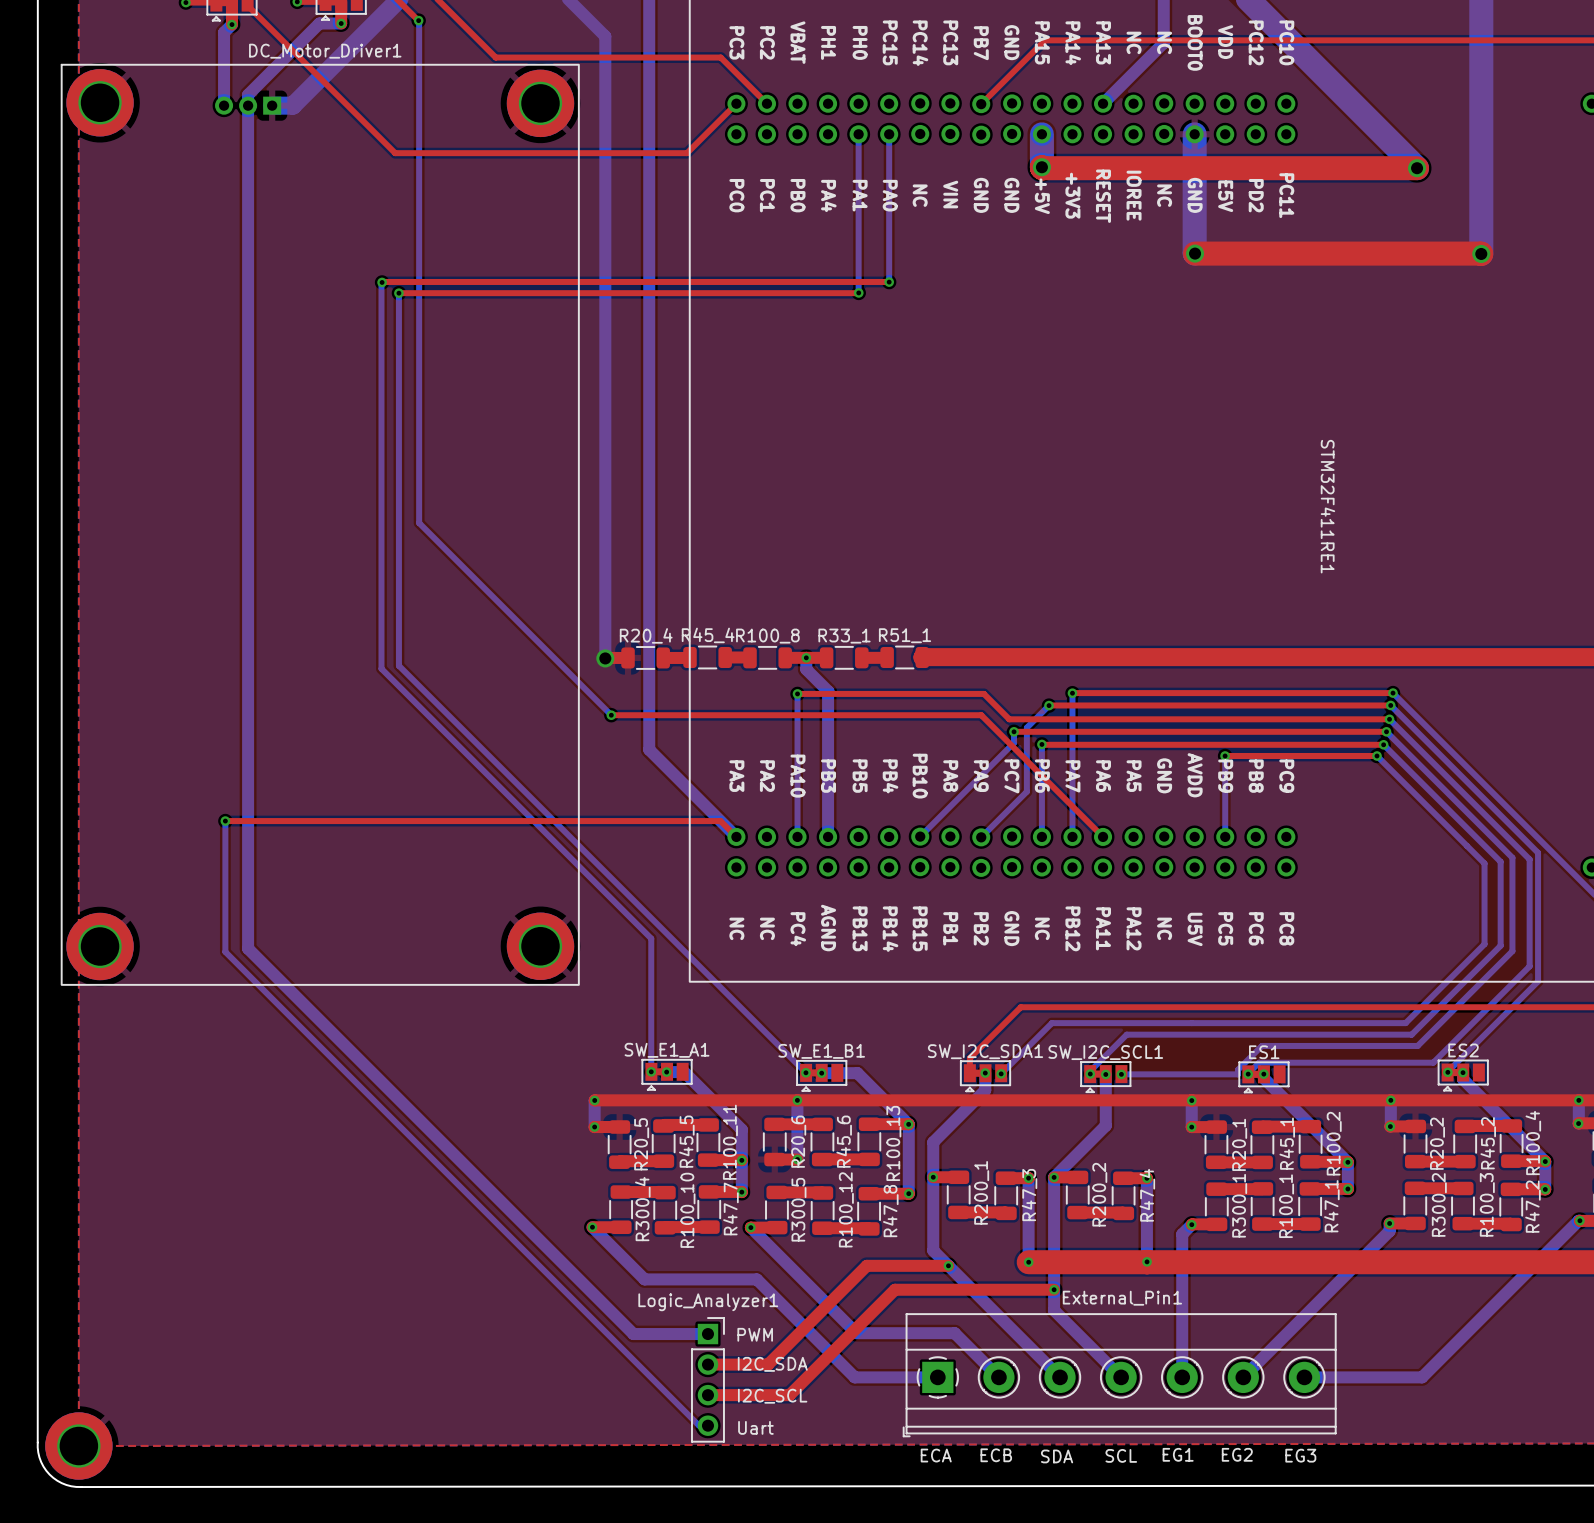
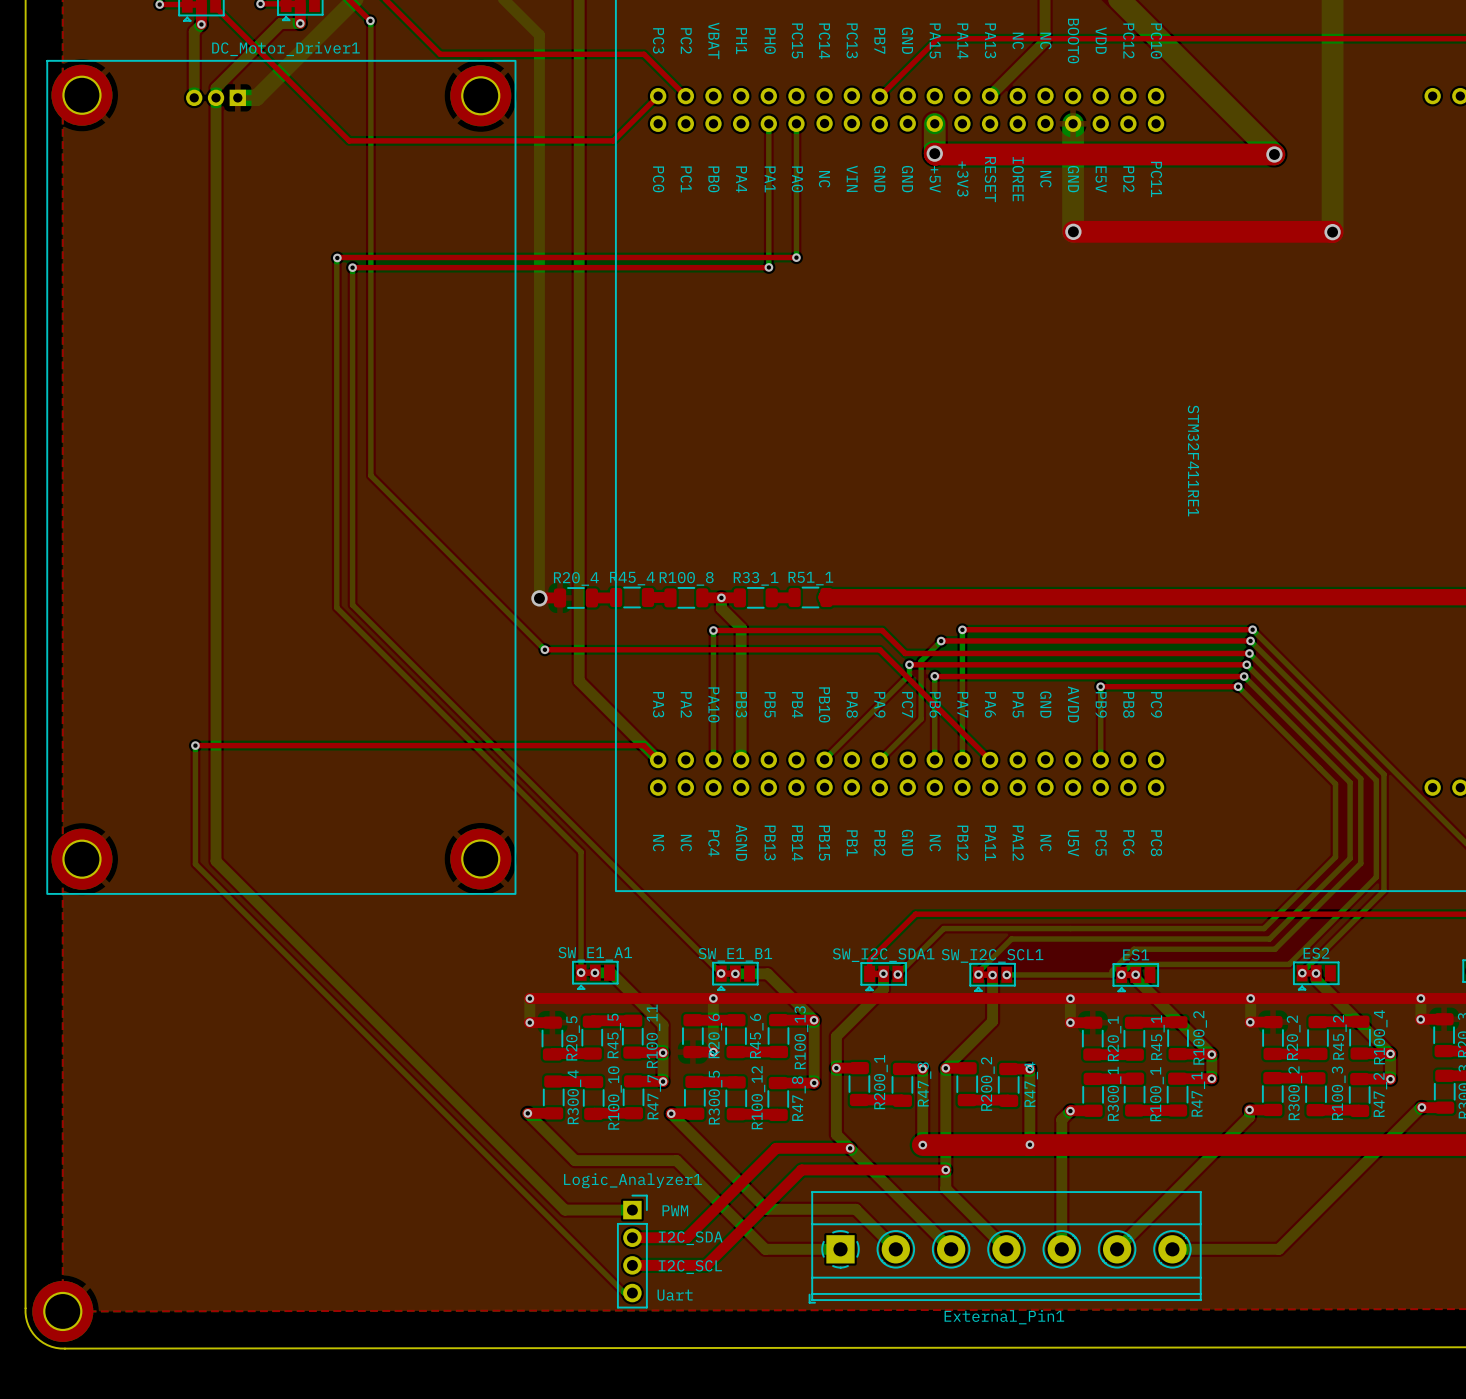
External_Pin1 name position: External_Pin1 (1122, 1298) -> External_Pin1 (1004, 1317)
text: EG1 (1178, 1454) -> none
text: EG2 (1237, 1454) -> none
text: ECA (936, 1455) -> none
text: ECB (996, 1455) -> none
text: SCL (1121, 1455) -> none
text: EG3 (1300, 1455) -> none
text: SDA (1057, 1456) -> none

